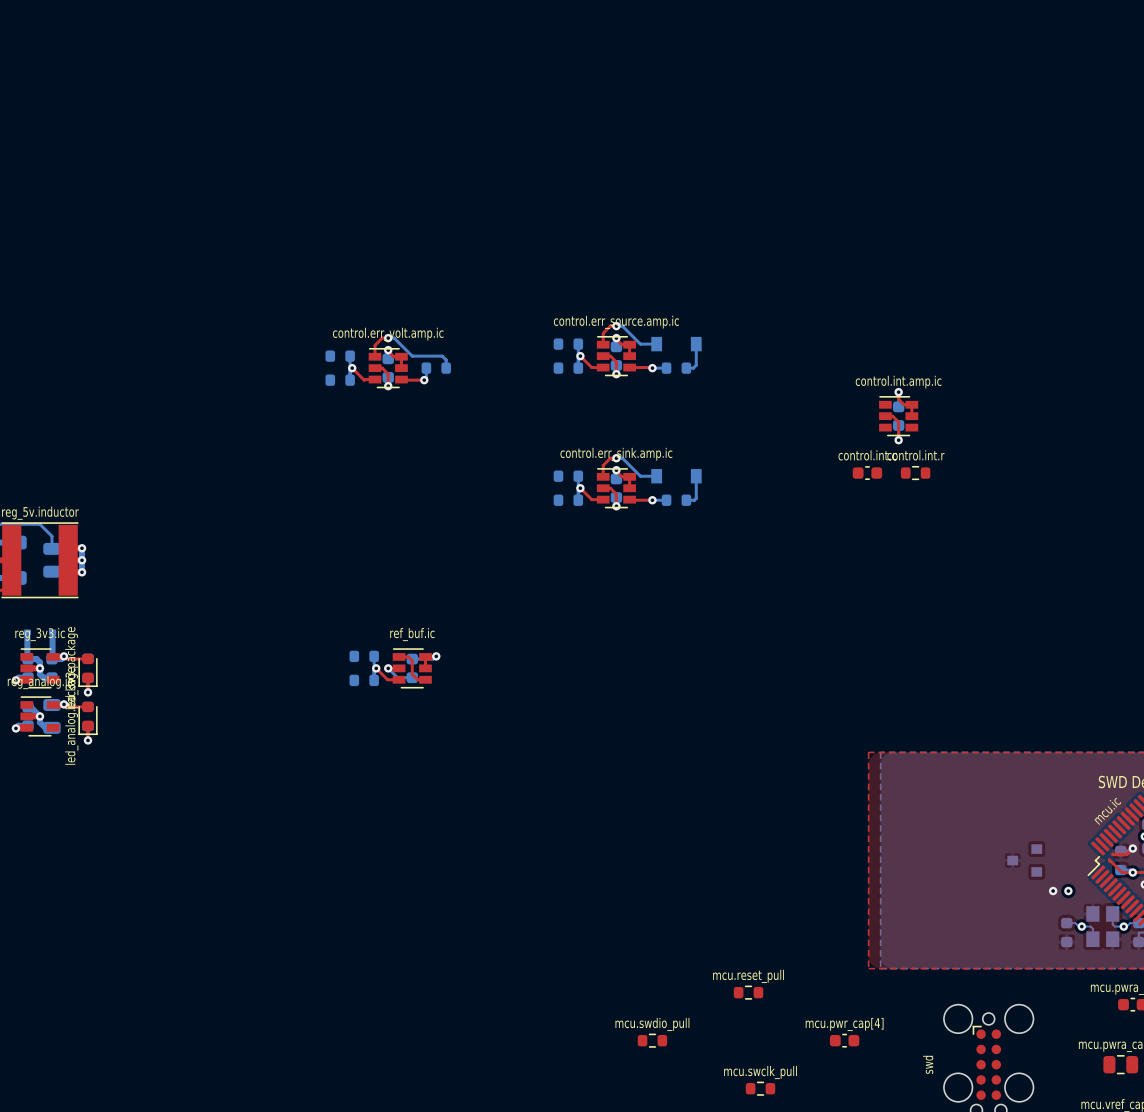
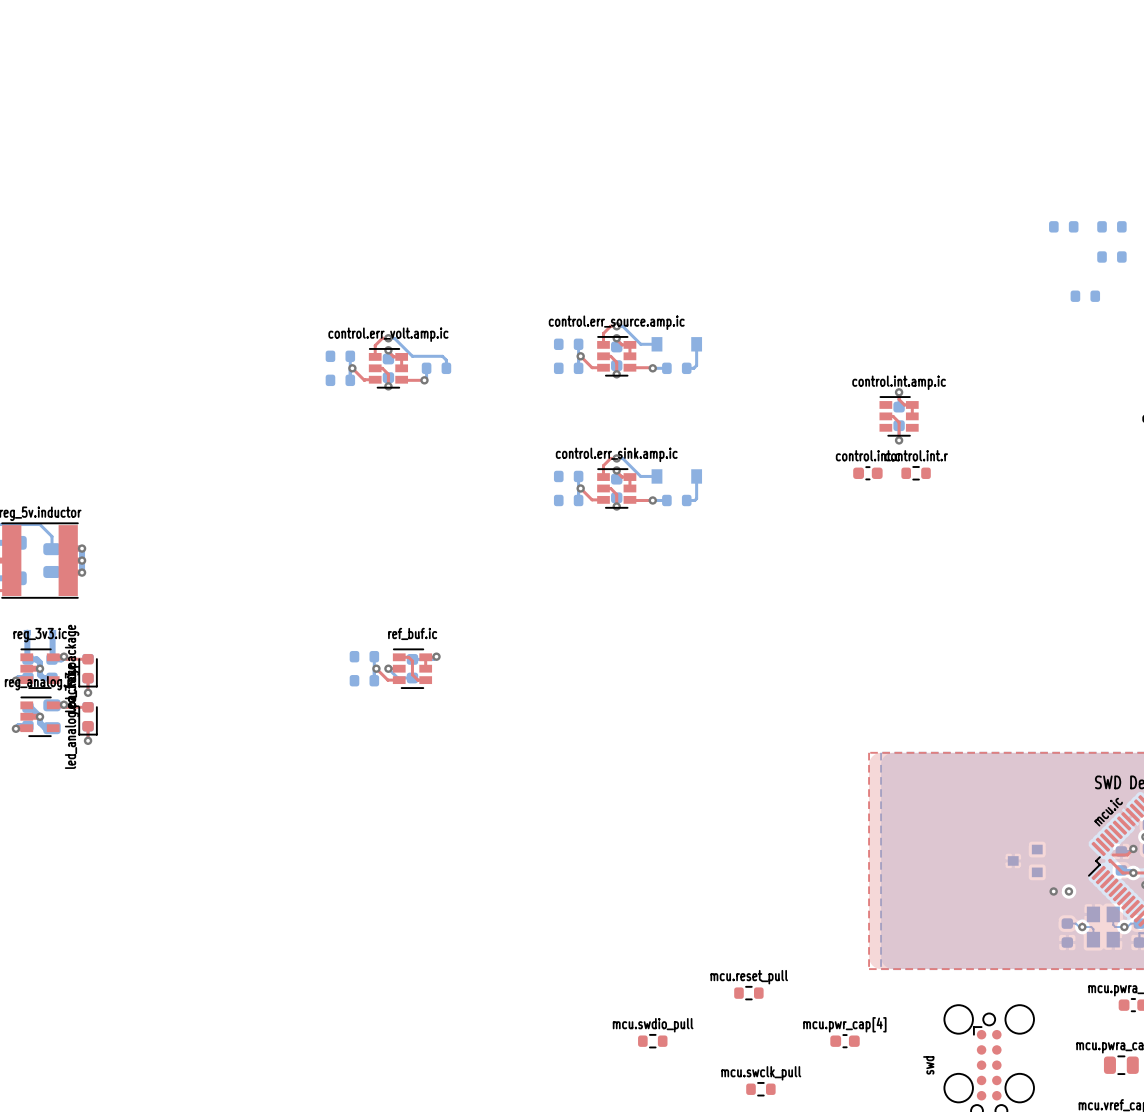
part: none -> (1063, 226)
part: none -> (1111, 226)
part: none -> (1111, 256)
part: none -> (1085, 296)

